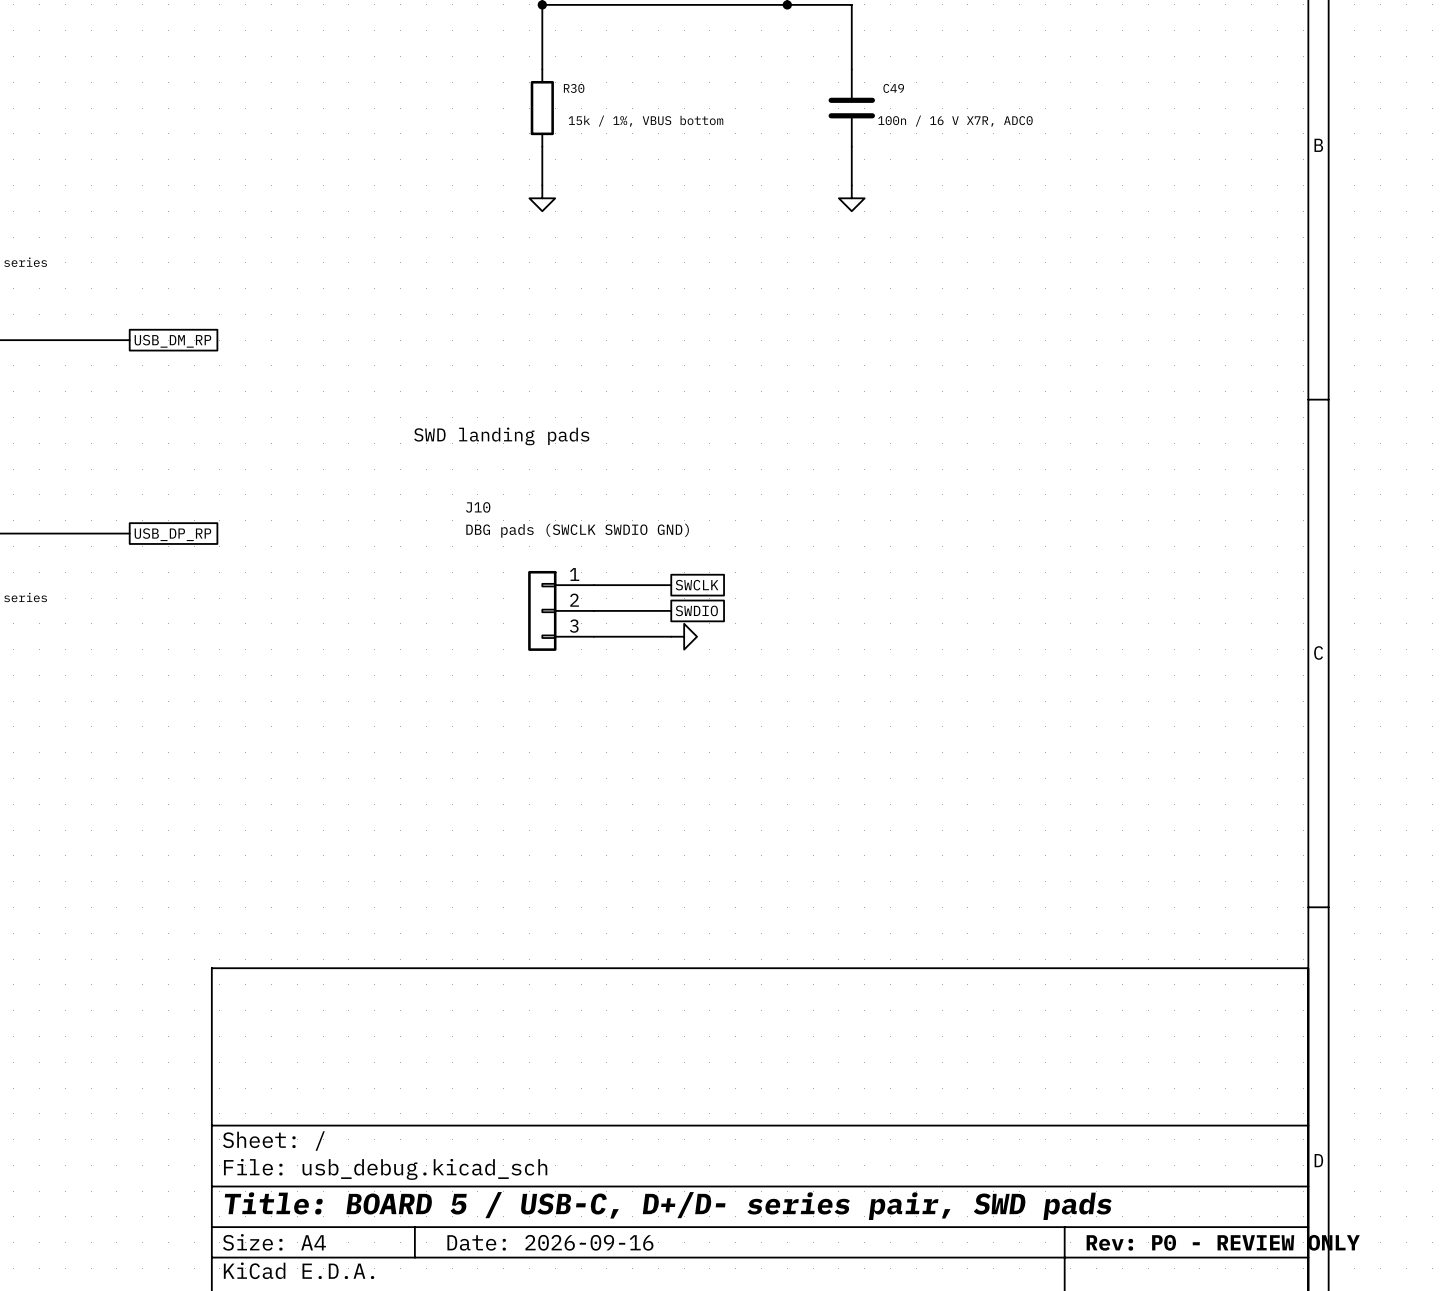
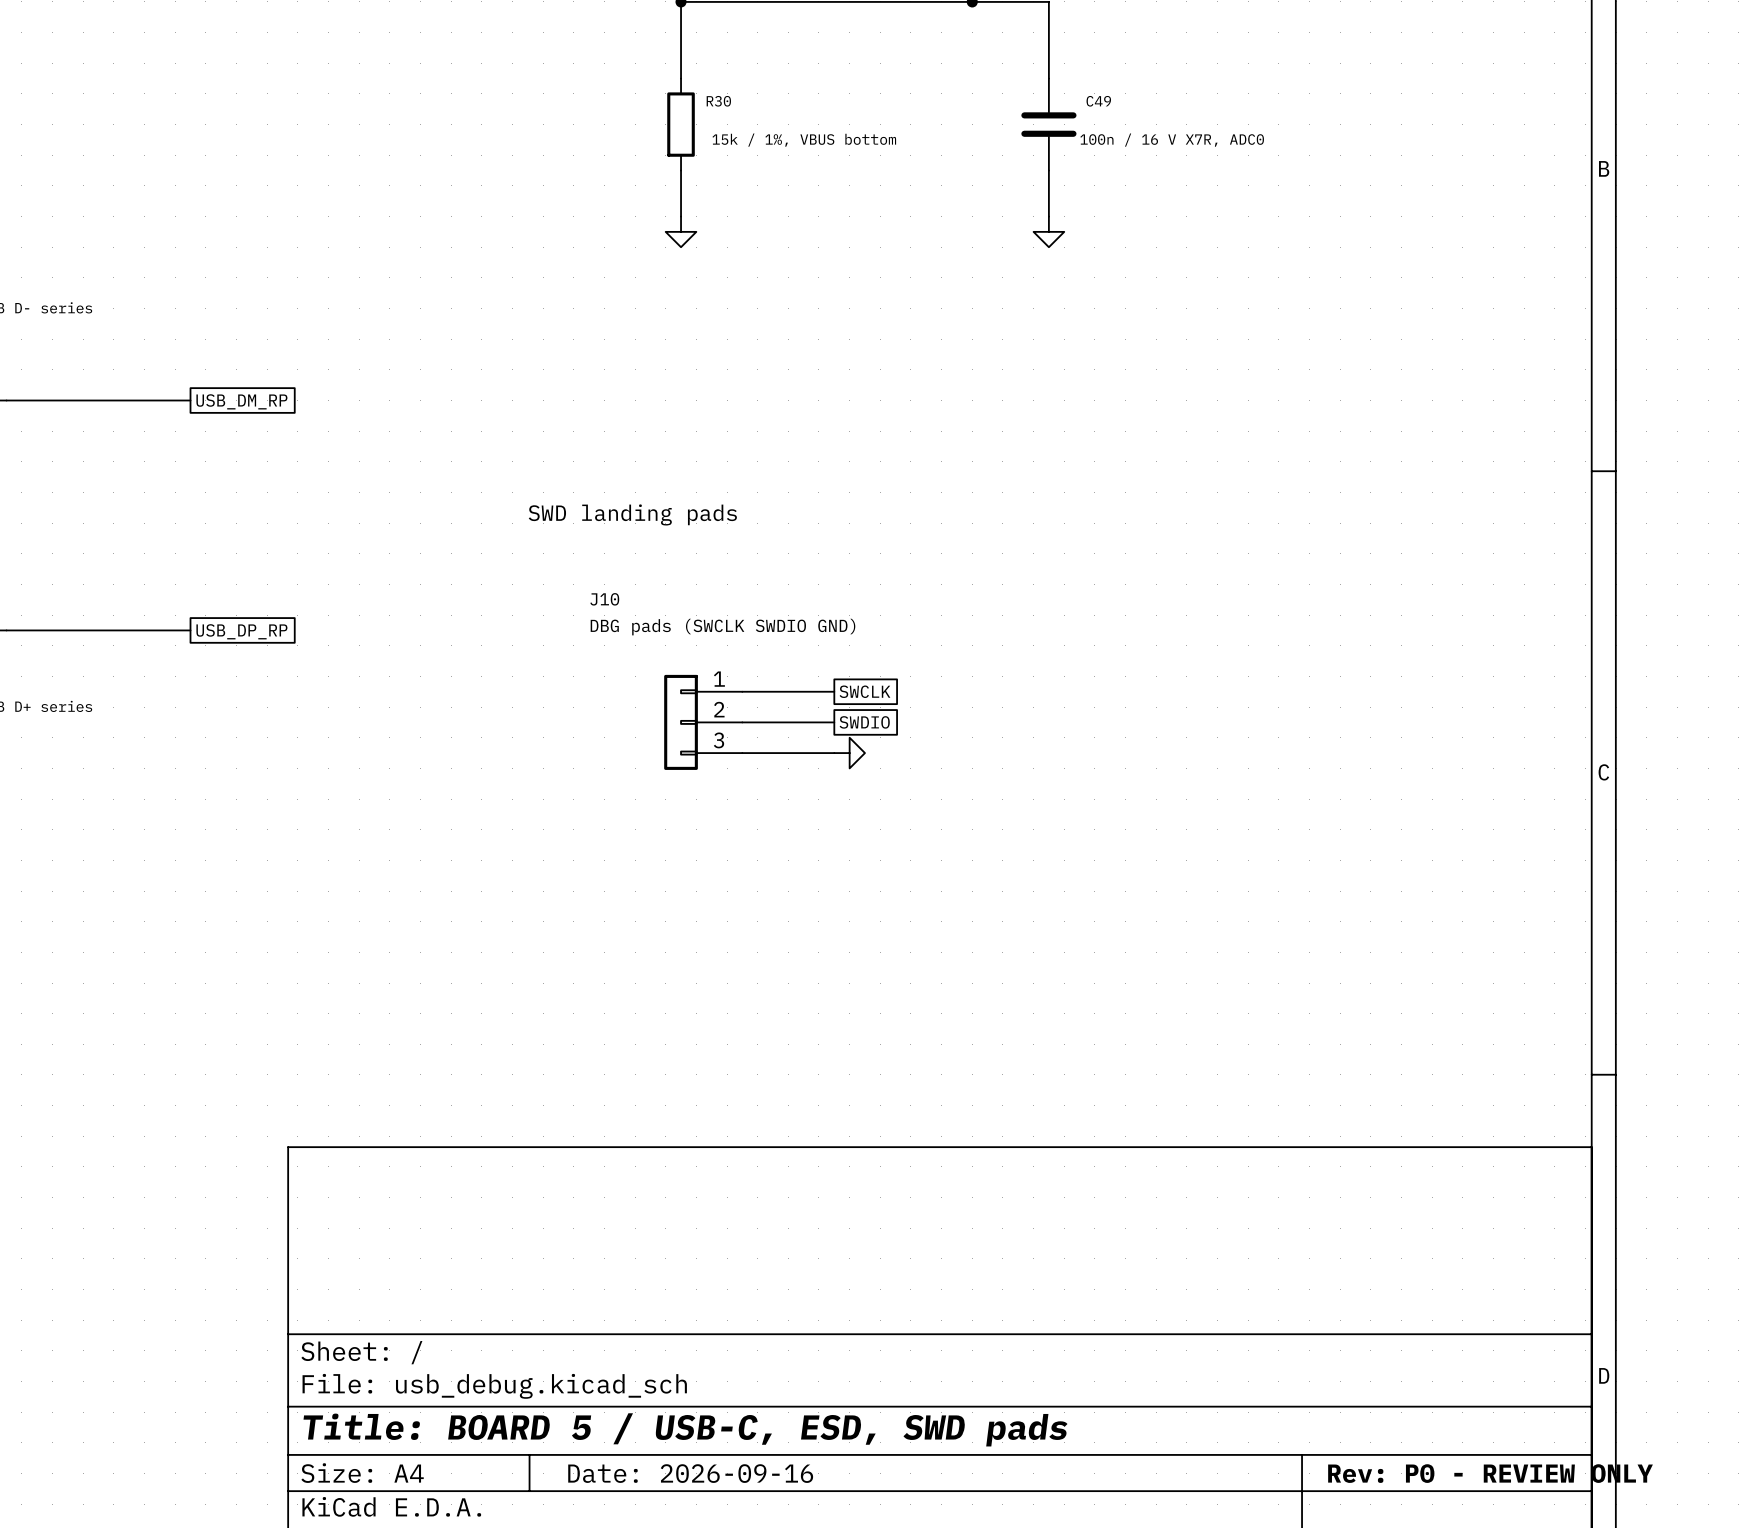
title block: Title: BOARD 5 / USB-C, D+/D- series pair, SWD pads (668, 1206) -> Title: BOARD 5 / USB-C, ESD, SWD pads (685, 1429)

